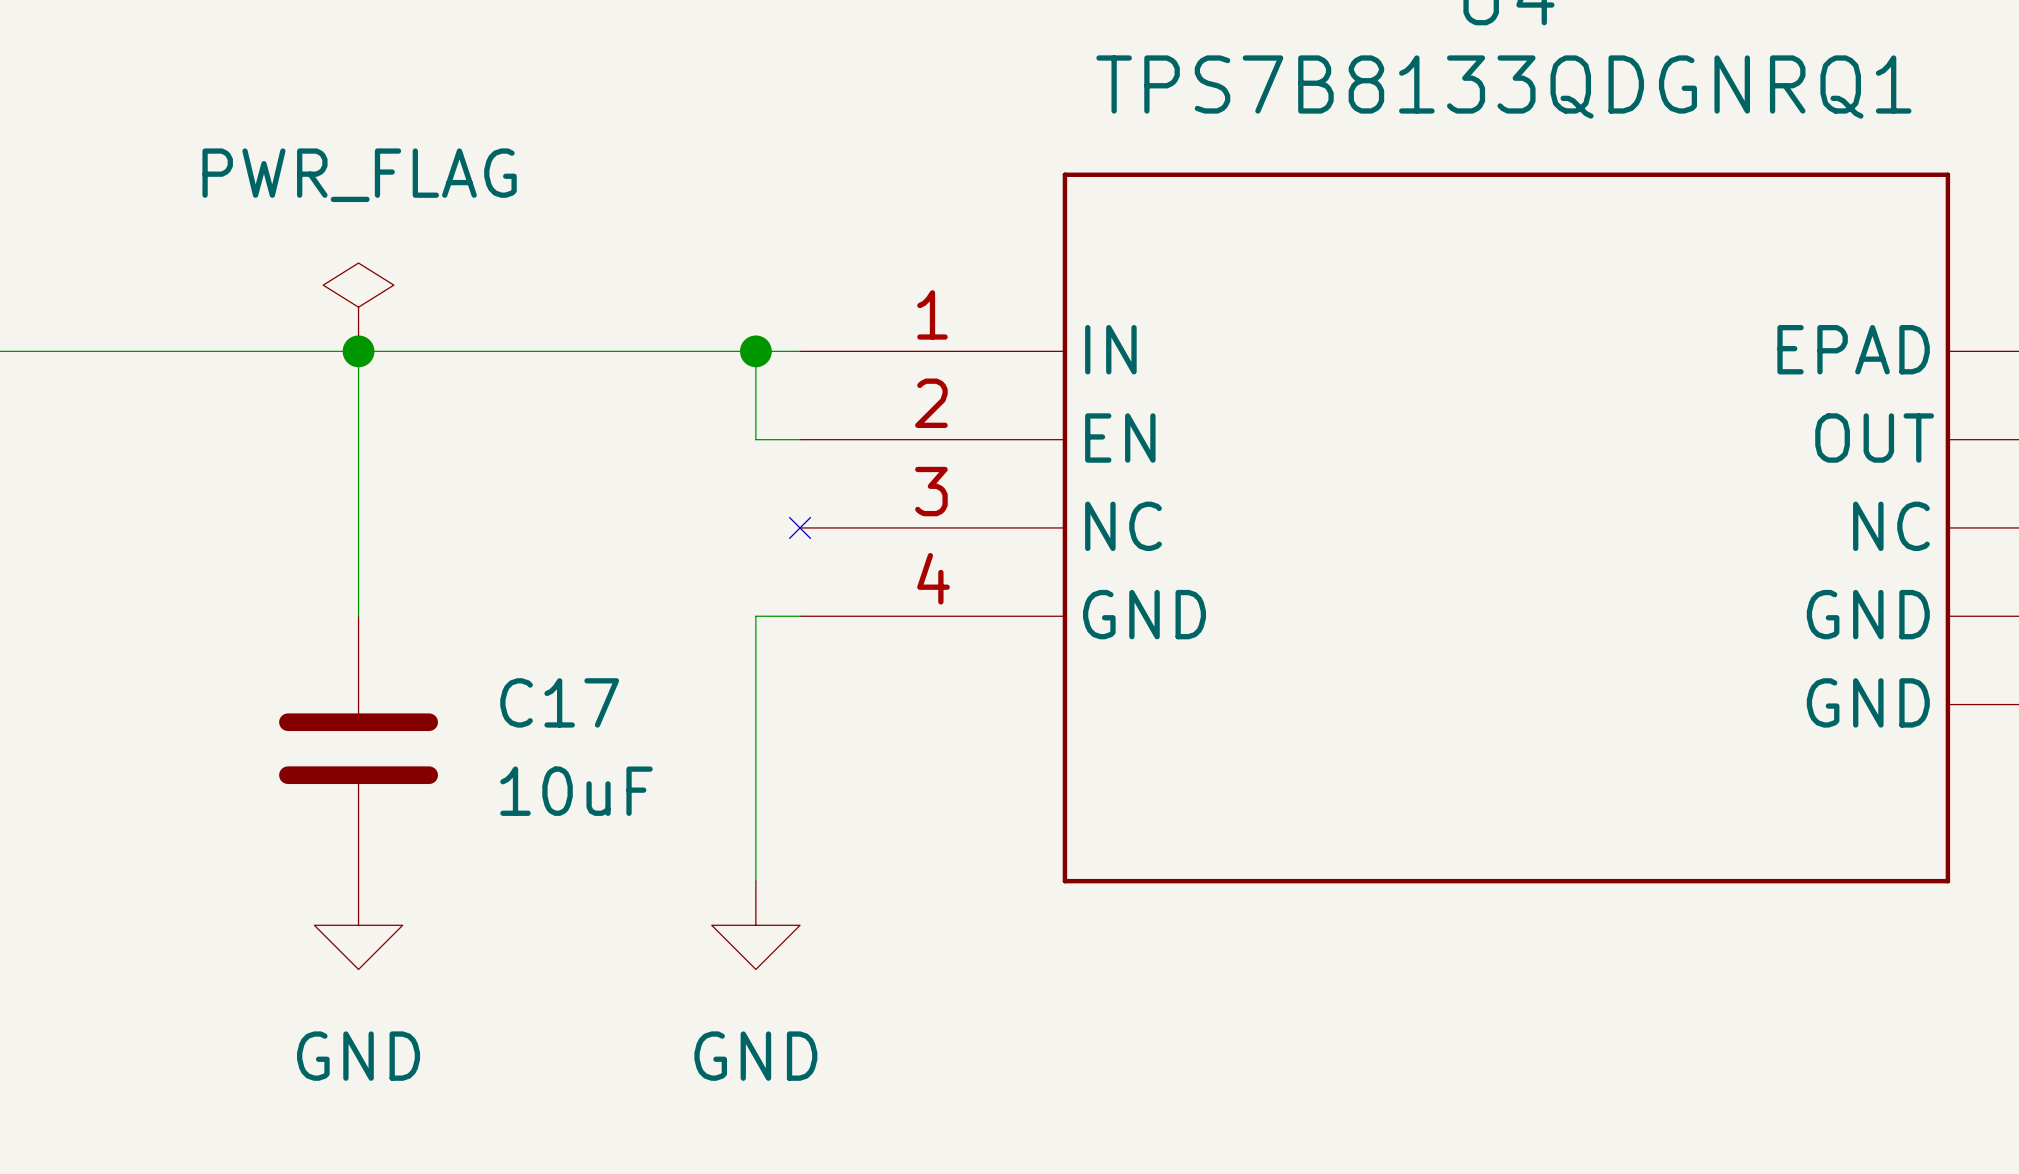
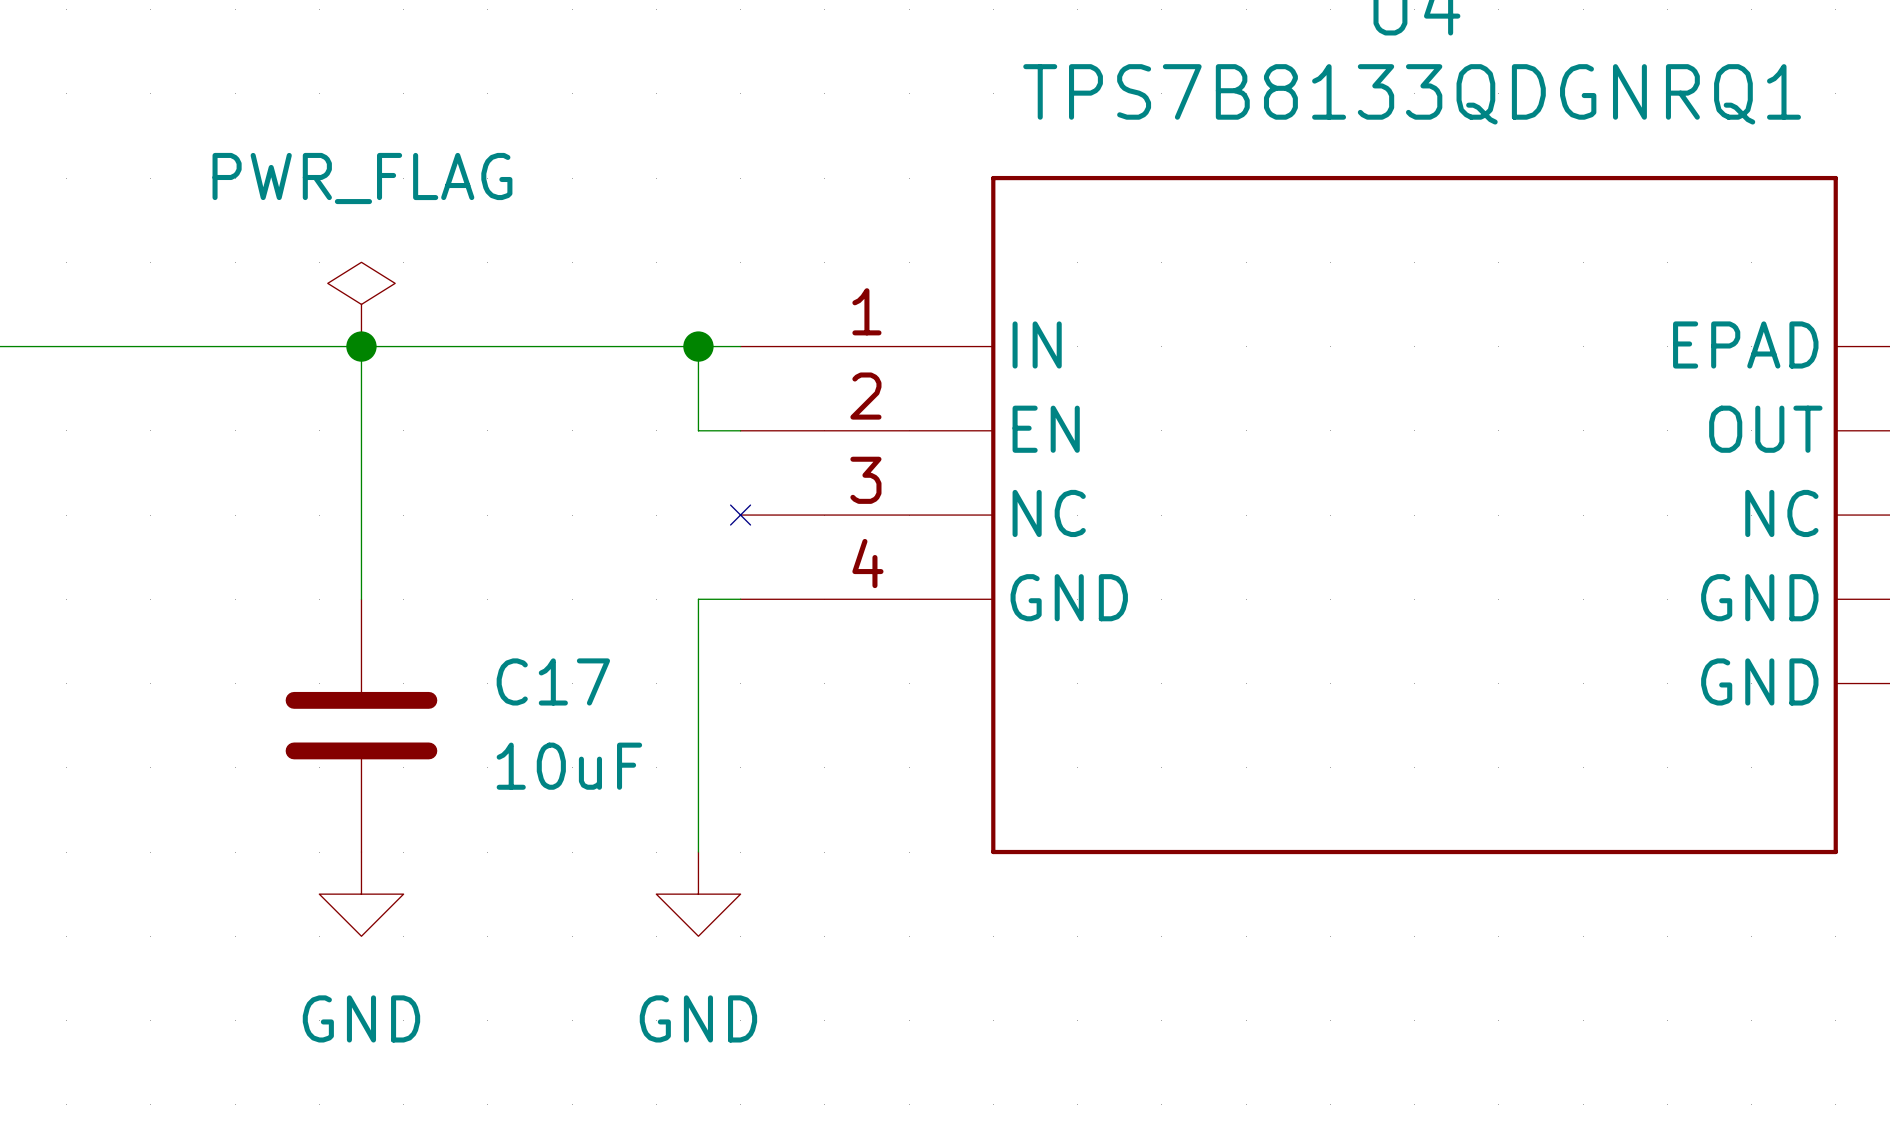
power symbol position: PWR_FLAG (358, 307) -> PWR_FLAG (361, 304)
wire: (358, 351) (358, 616) -> (361, 346) (361, 599)
junction position: (358, 351) -> (361, 346)
C17 position: (358, 748) -> (361, 725)
power symbol position: GND (358, 925) -> GND (361, 894)

